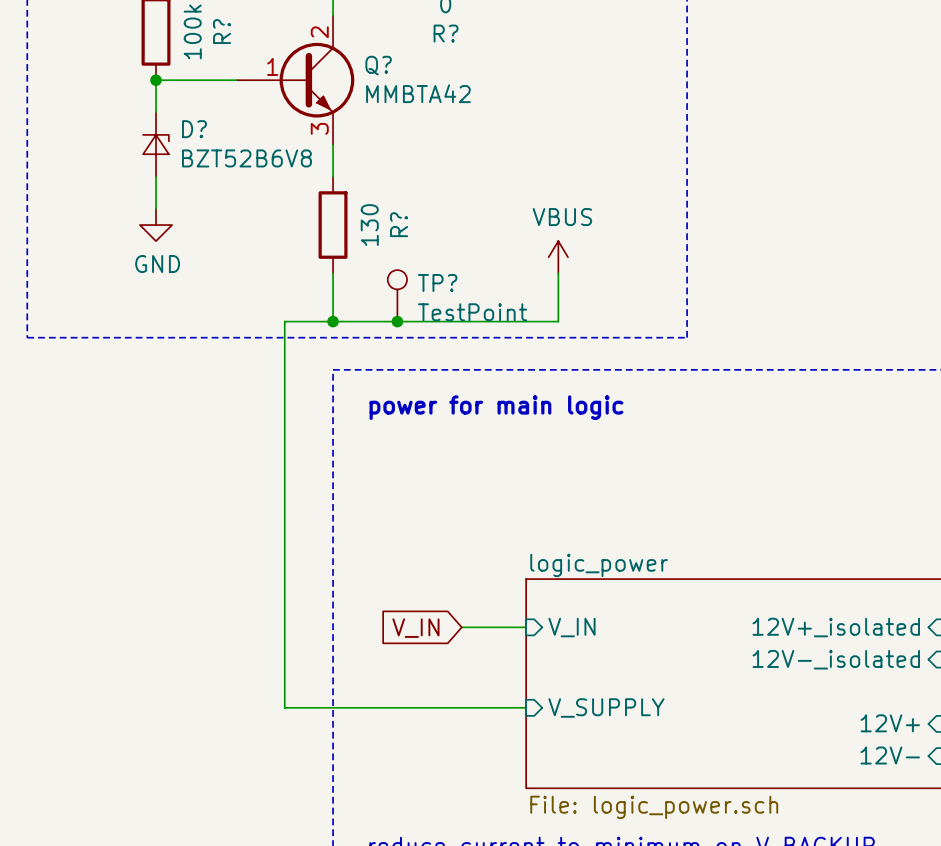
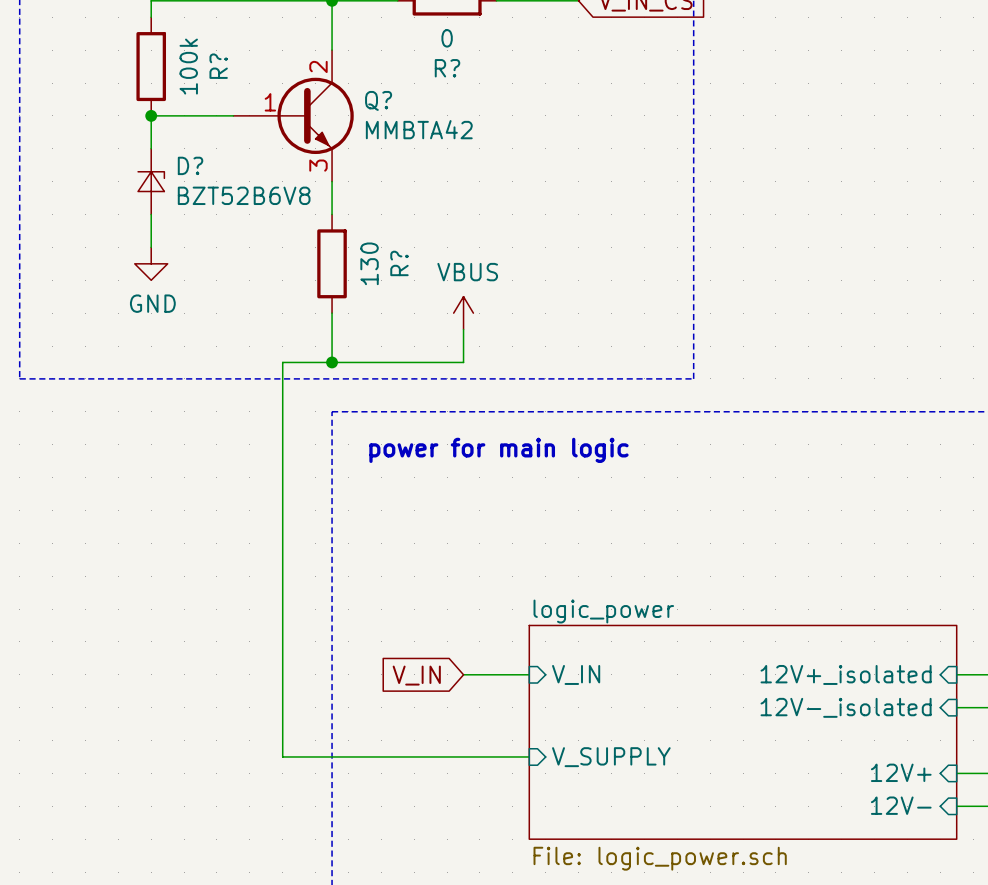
power symbol position: VBUS (558, 257) -> VBUS (463, 313)
wire: (558, 273) (558, 321) (461, 321) -> (463, 329) (463, 362)
TP?: TestPoint (397, 295) -> none
junction: (397, 321) -> none

